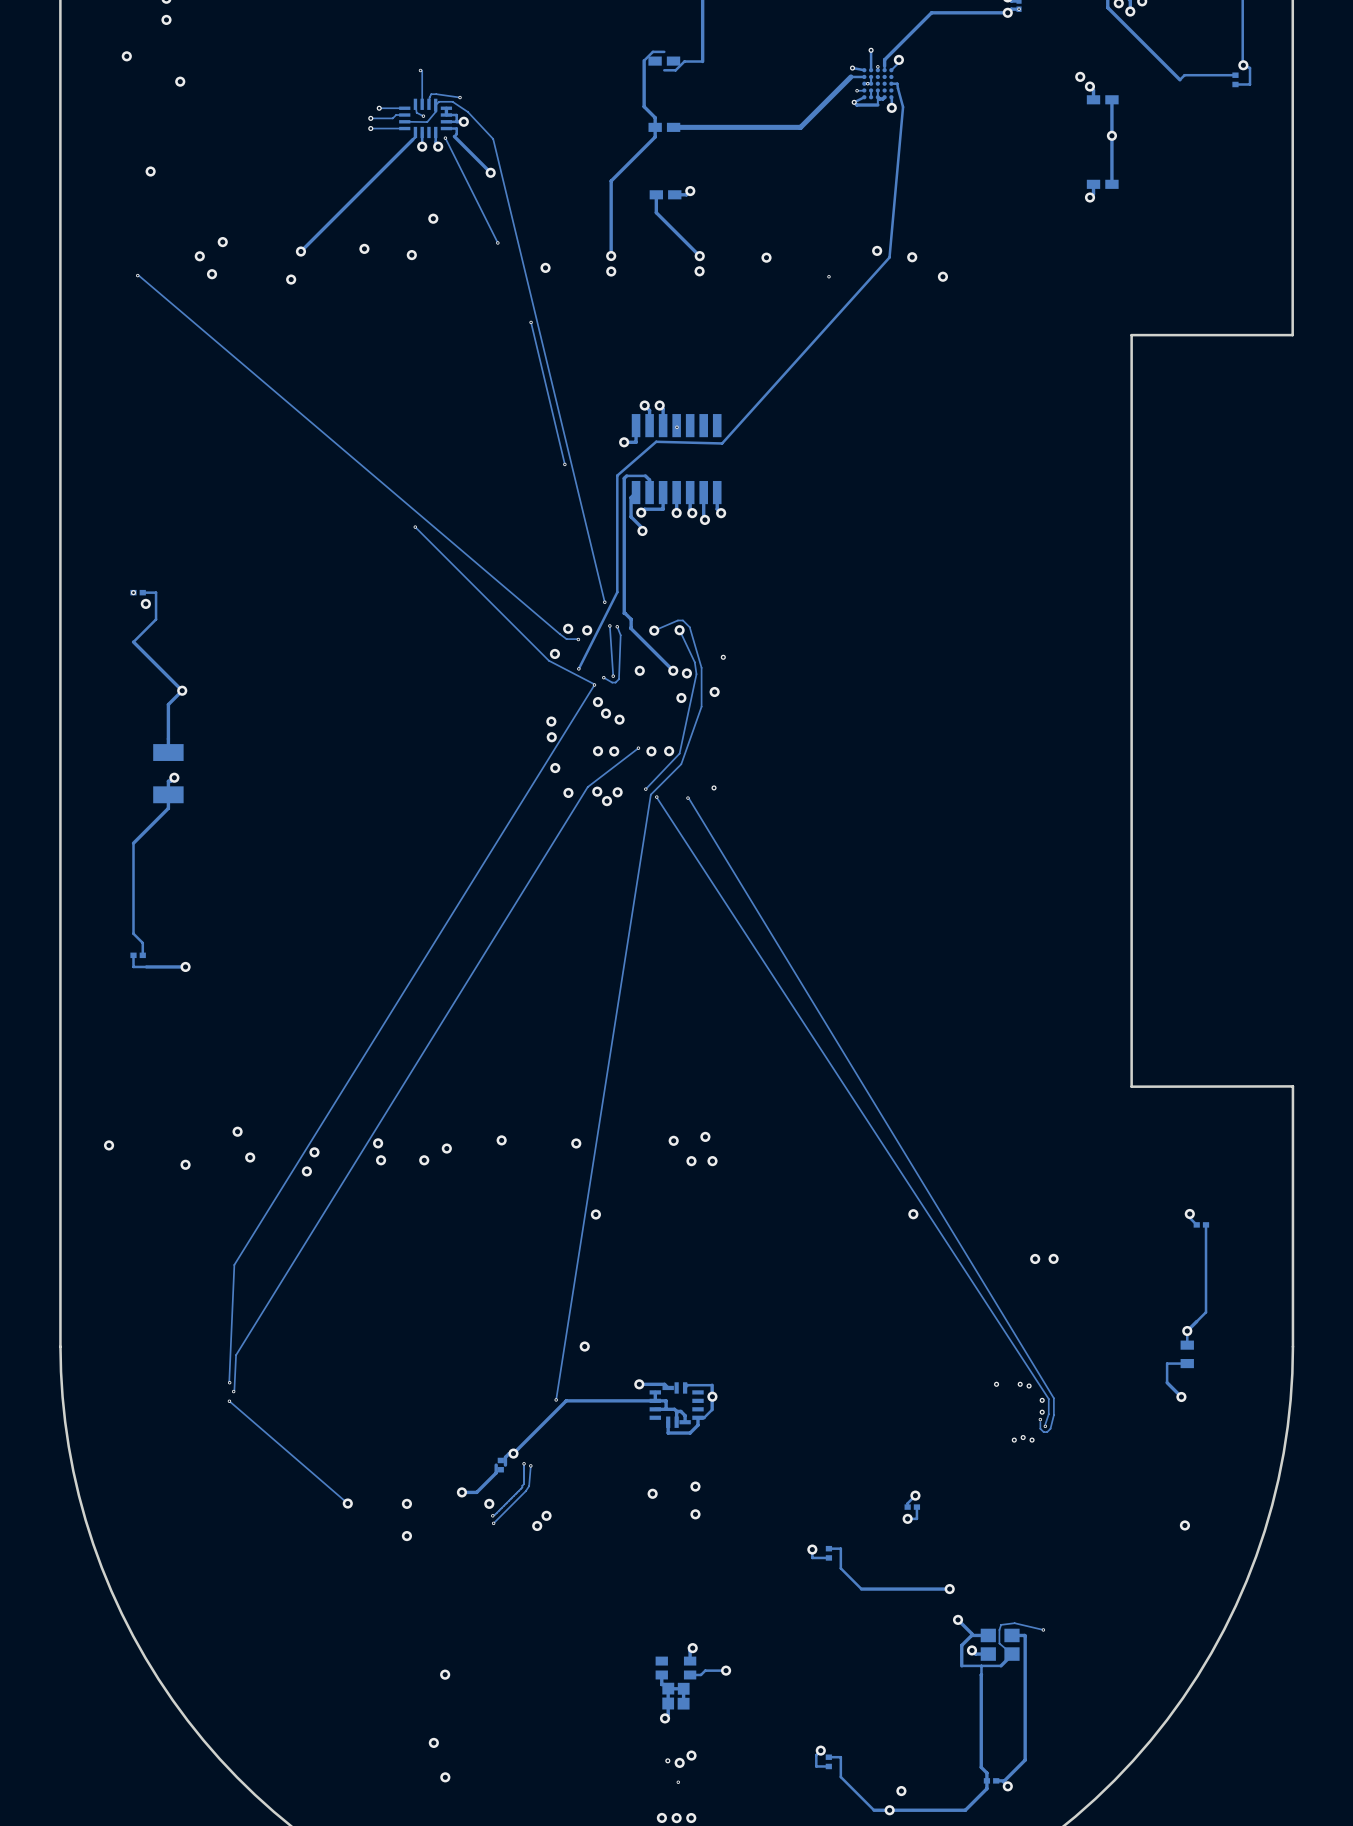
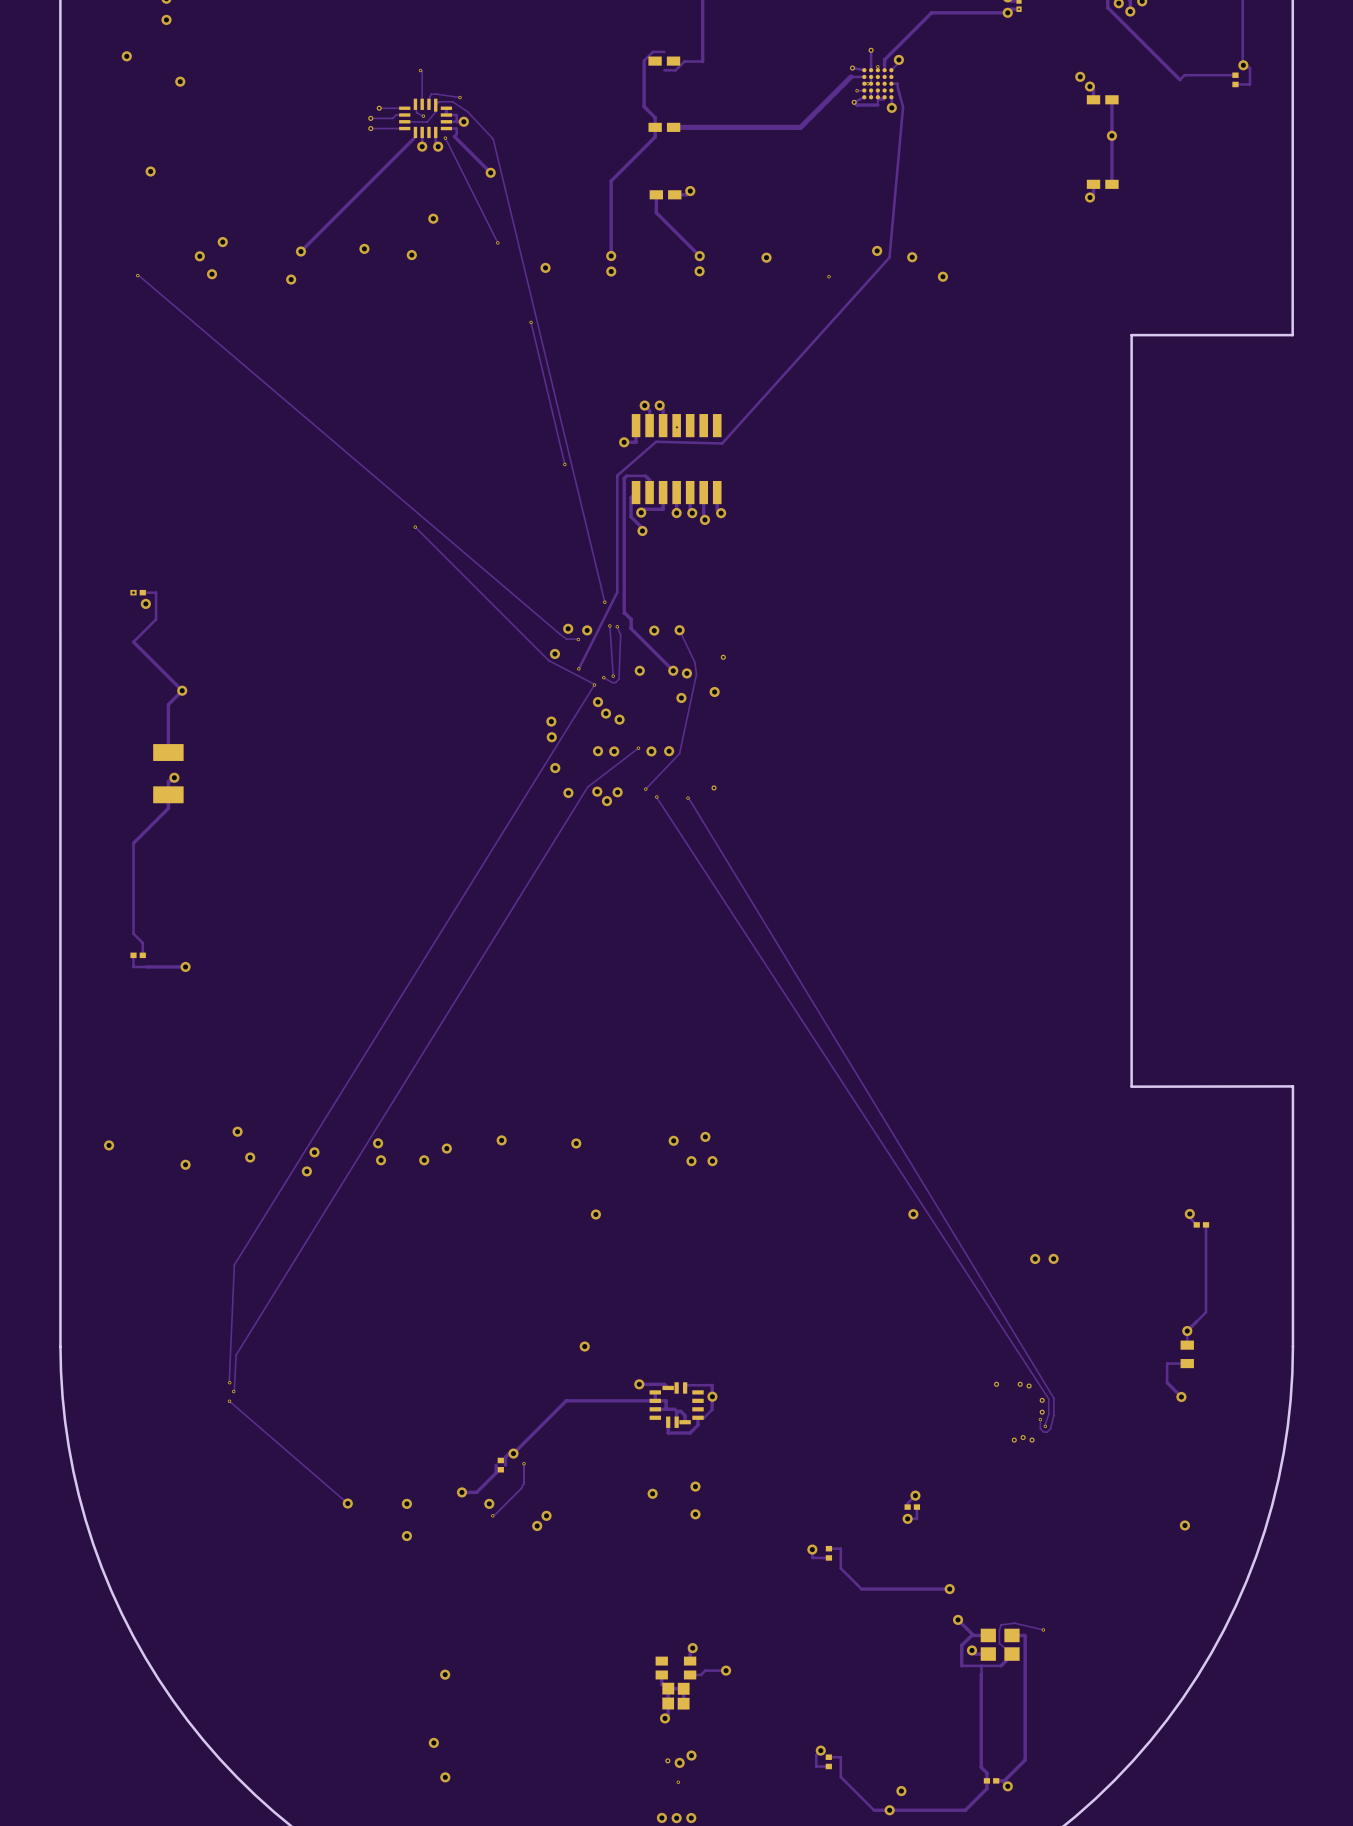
track: (654, 630) (677, 620) (682, 620) (689, 627) (701, 667) (701, 706) (681, 764) (650, 794) (556, 1399) -> none
via: (556, 1399) -> none
track: (530, 1465) (529, 1486) (493, 1523) -> none
via: (530, 1465) -> none
via: (493, 1523) -> none

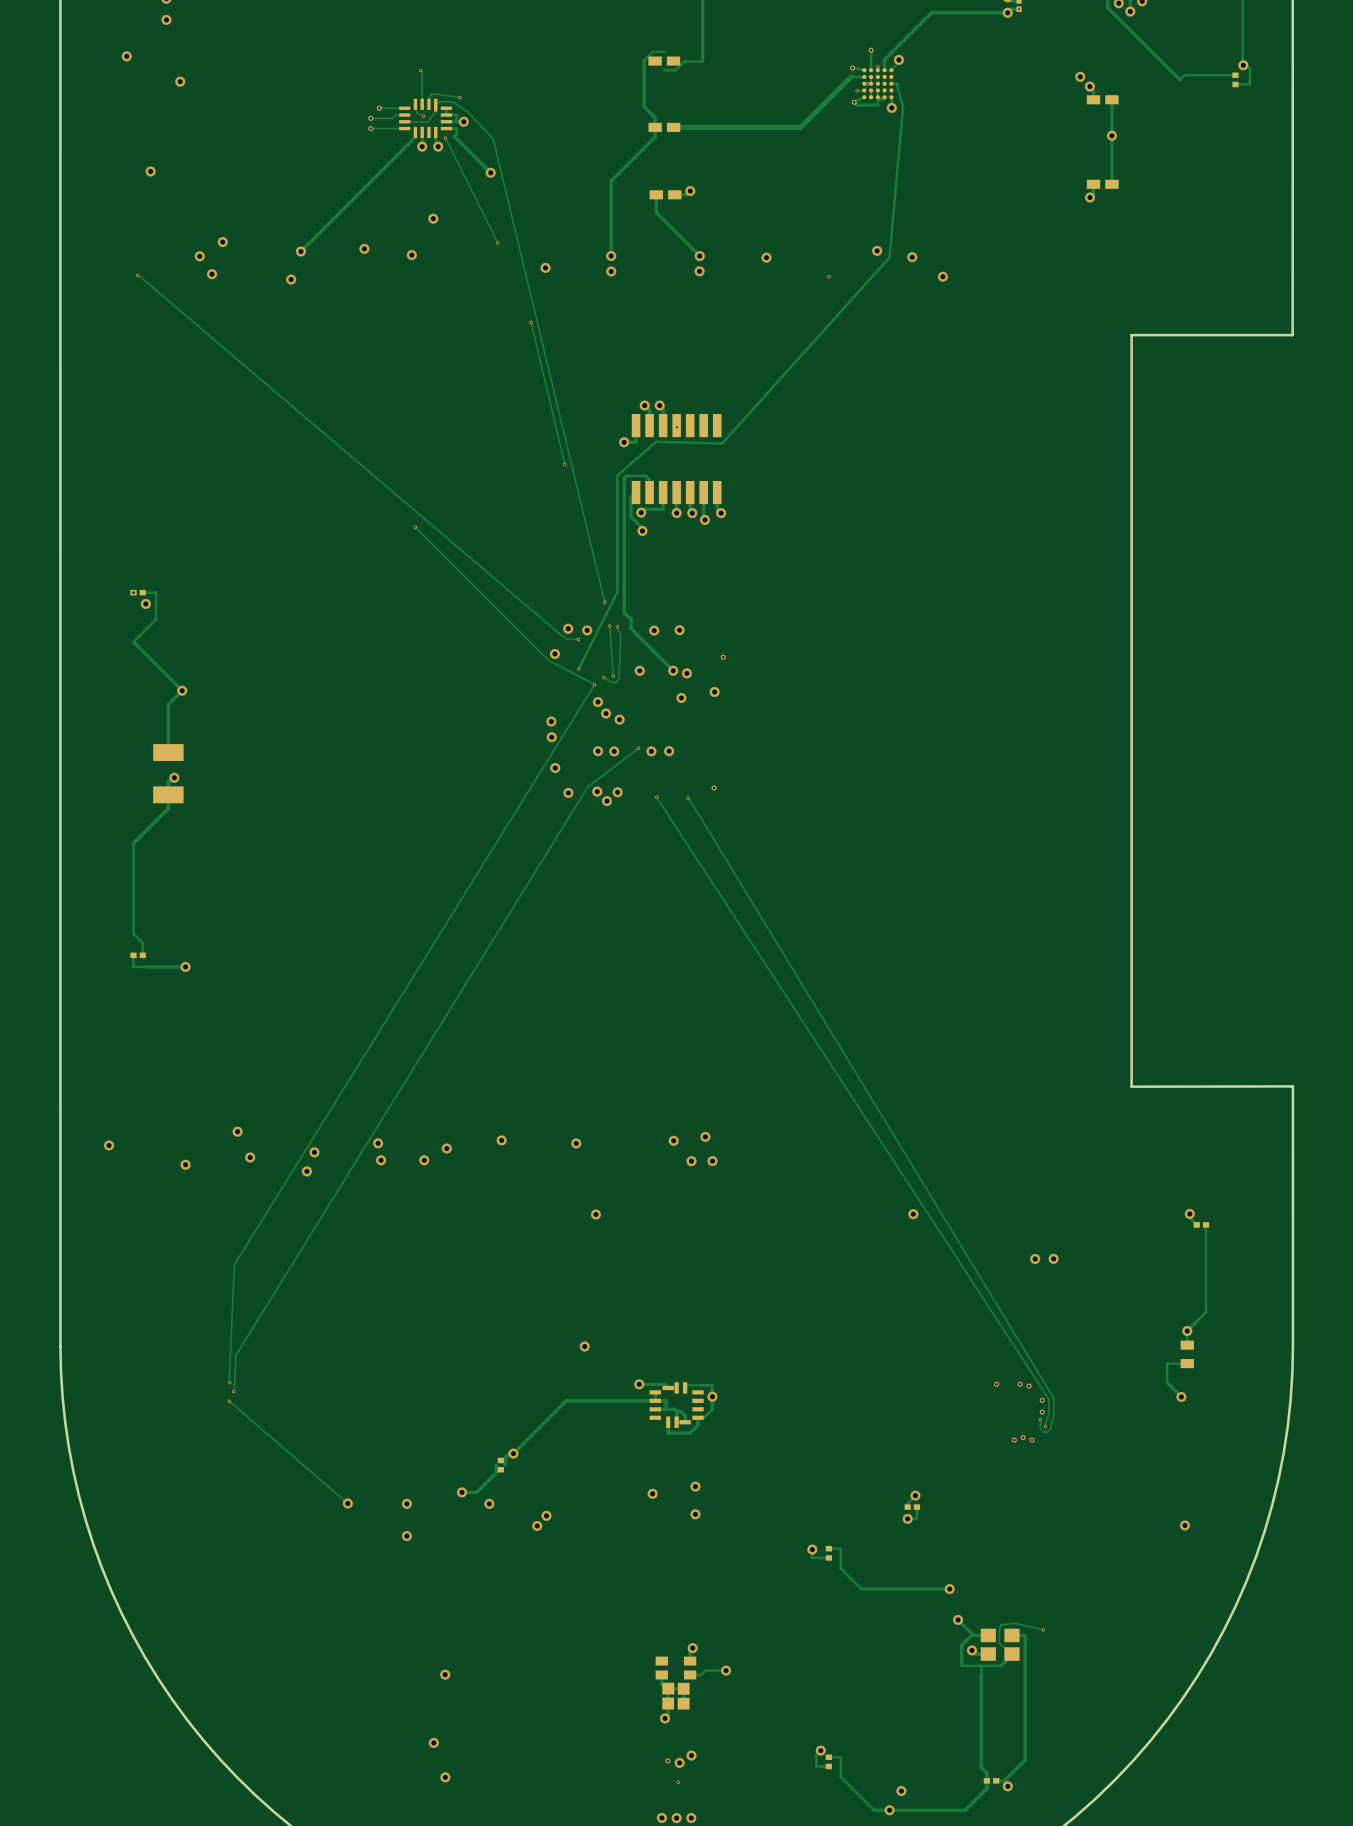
track: (679, 630) (694, 662) (696, 674) (679, 753) (645, 789) -> none
via: (645, 789) -> none
track: (524, 1463) (522, 1487) (492, 1515) -> none
via: (524, 1463) -> none
via: (492, 1515) -> none

